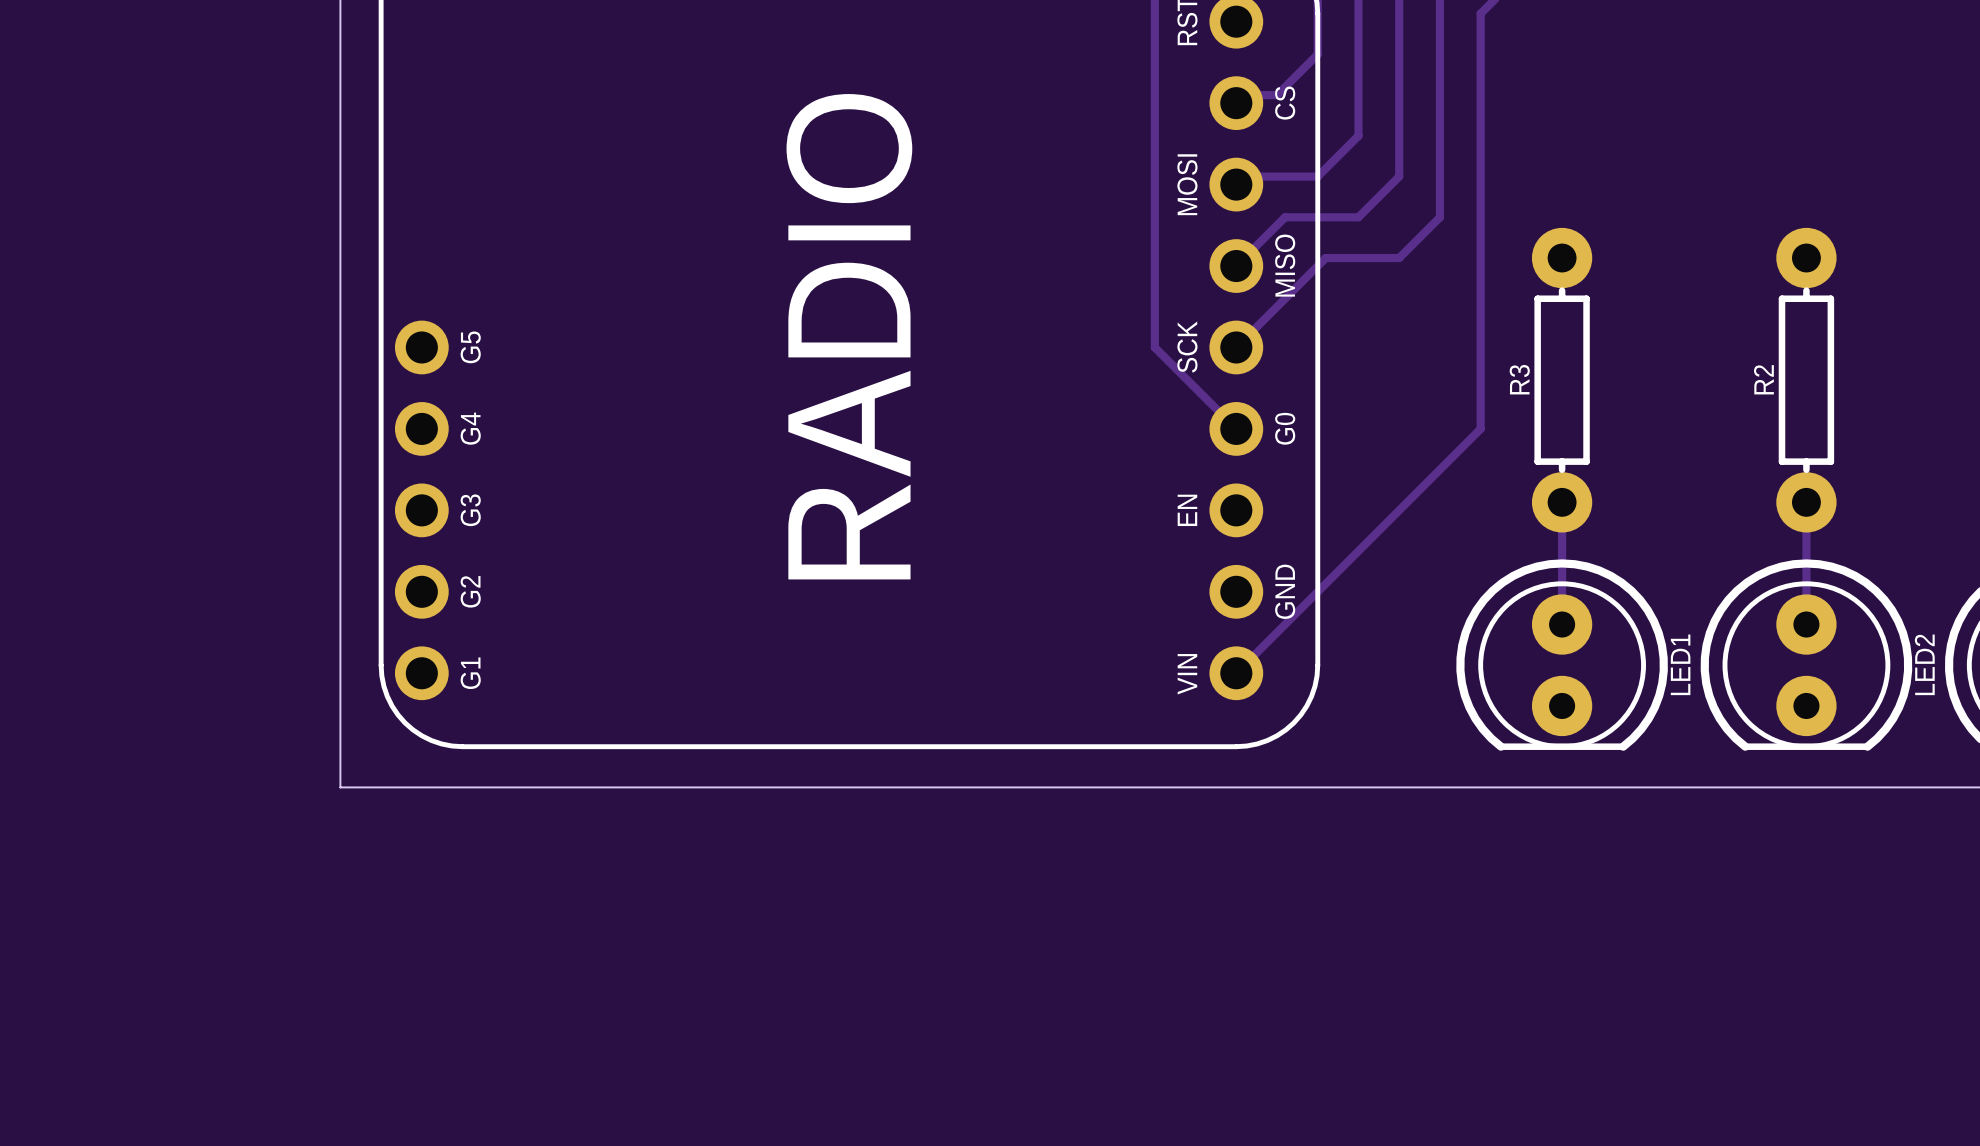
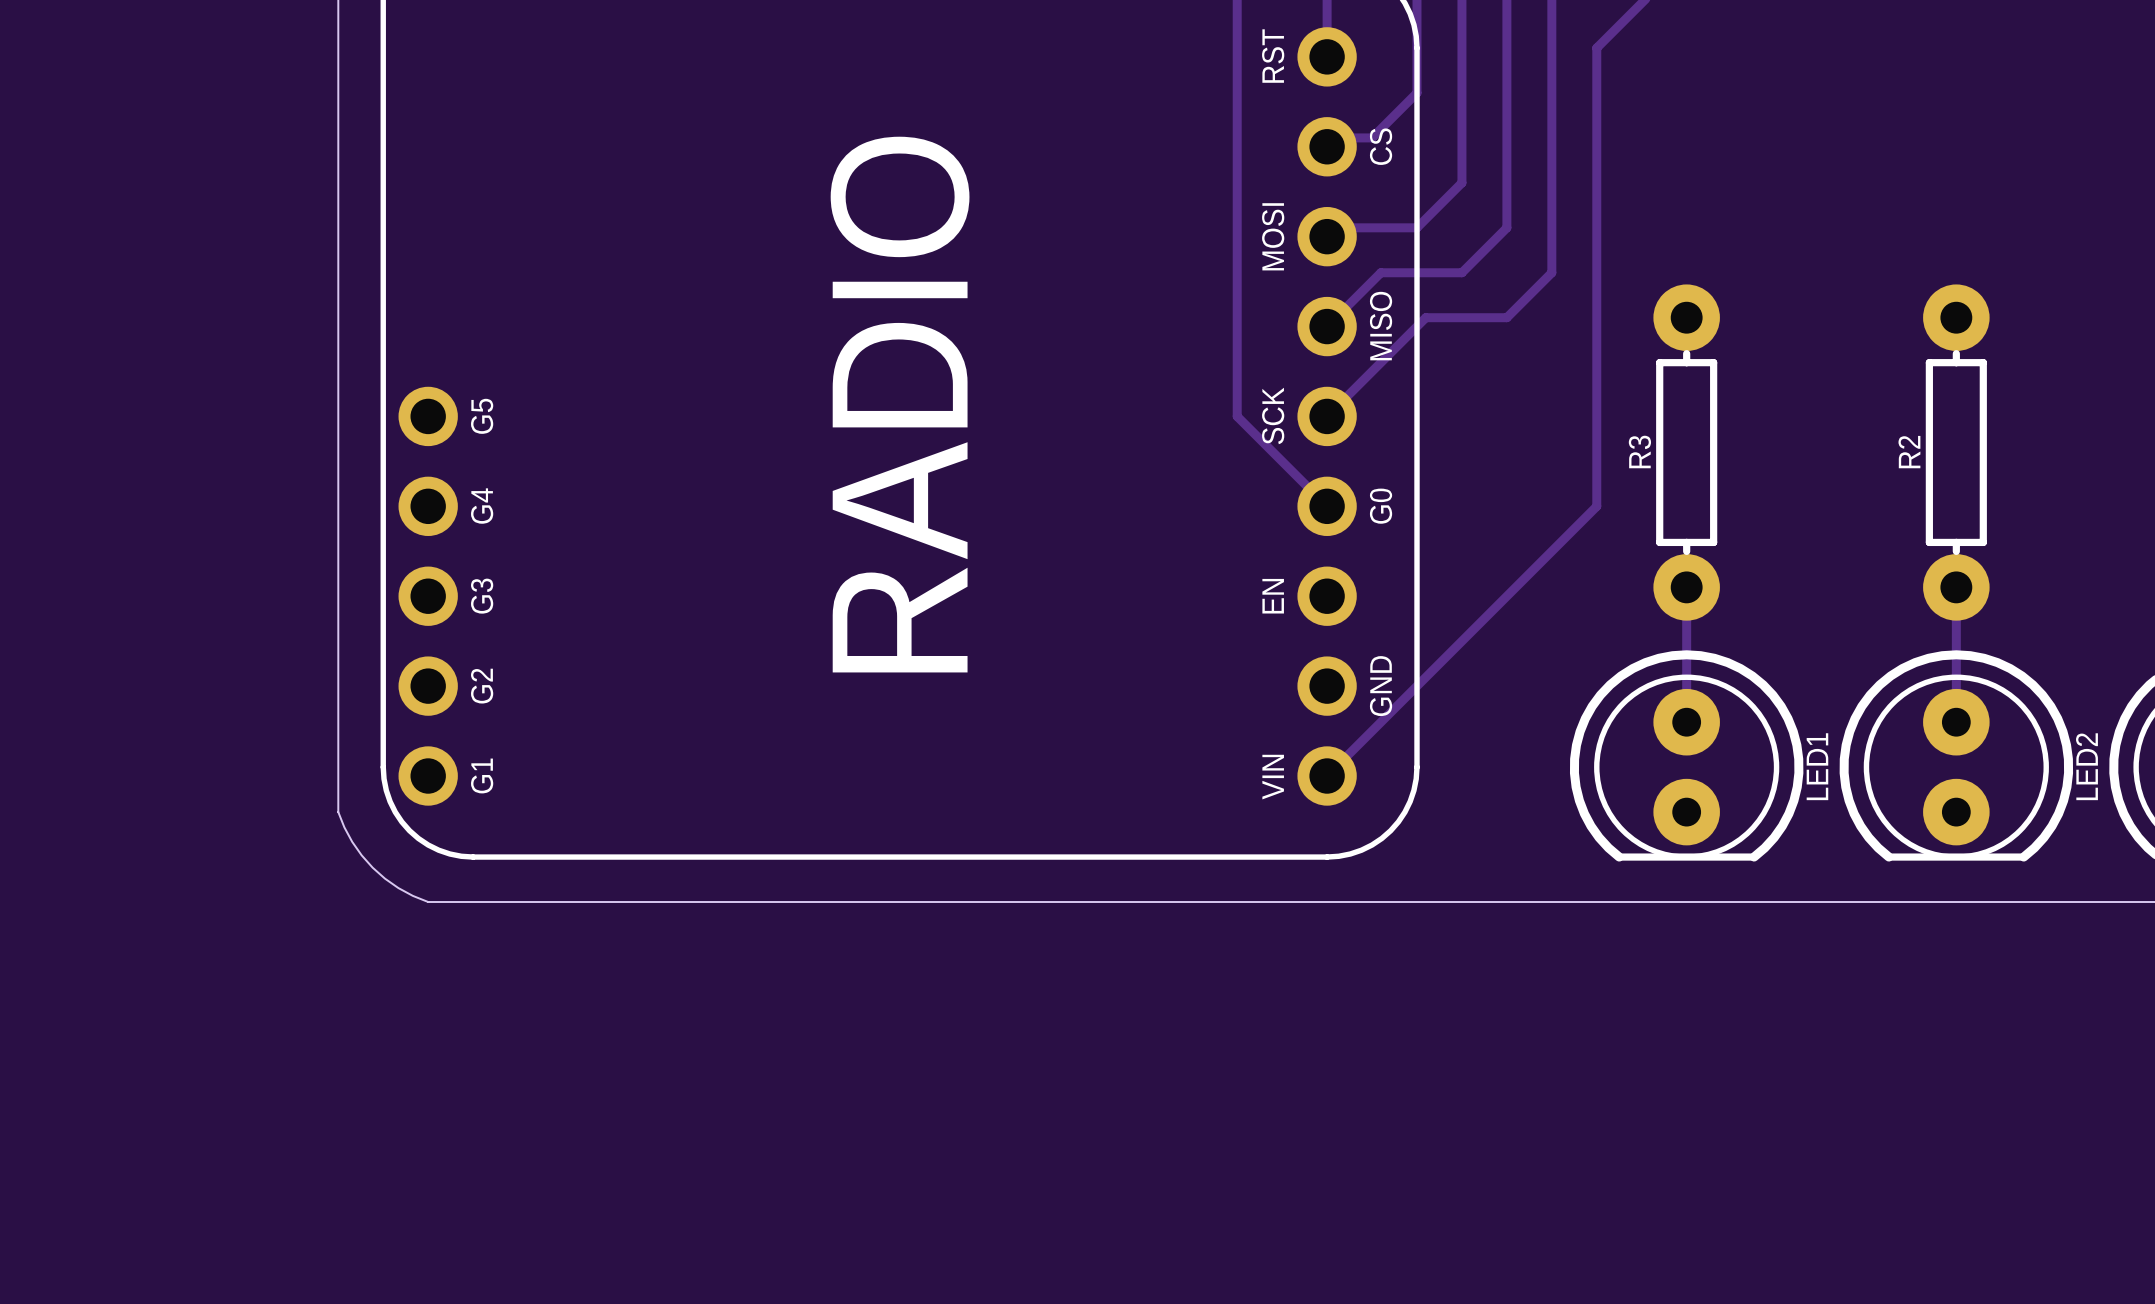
board edge: (340, 705) (340, 787) (421, 787) -> (338, 812) (352, 841) (372, 867) (398, 888) (428, 902)

